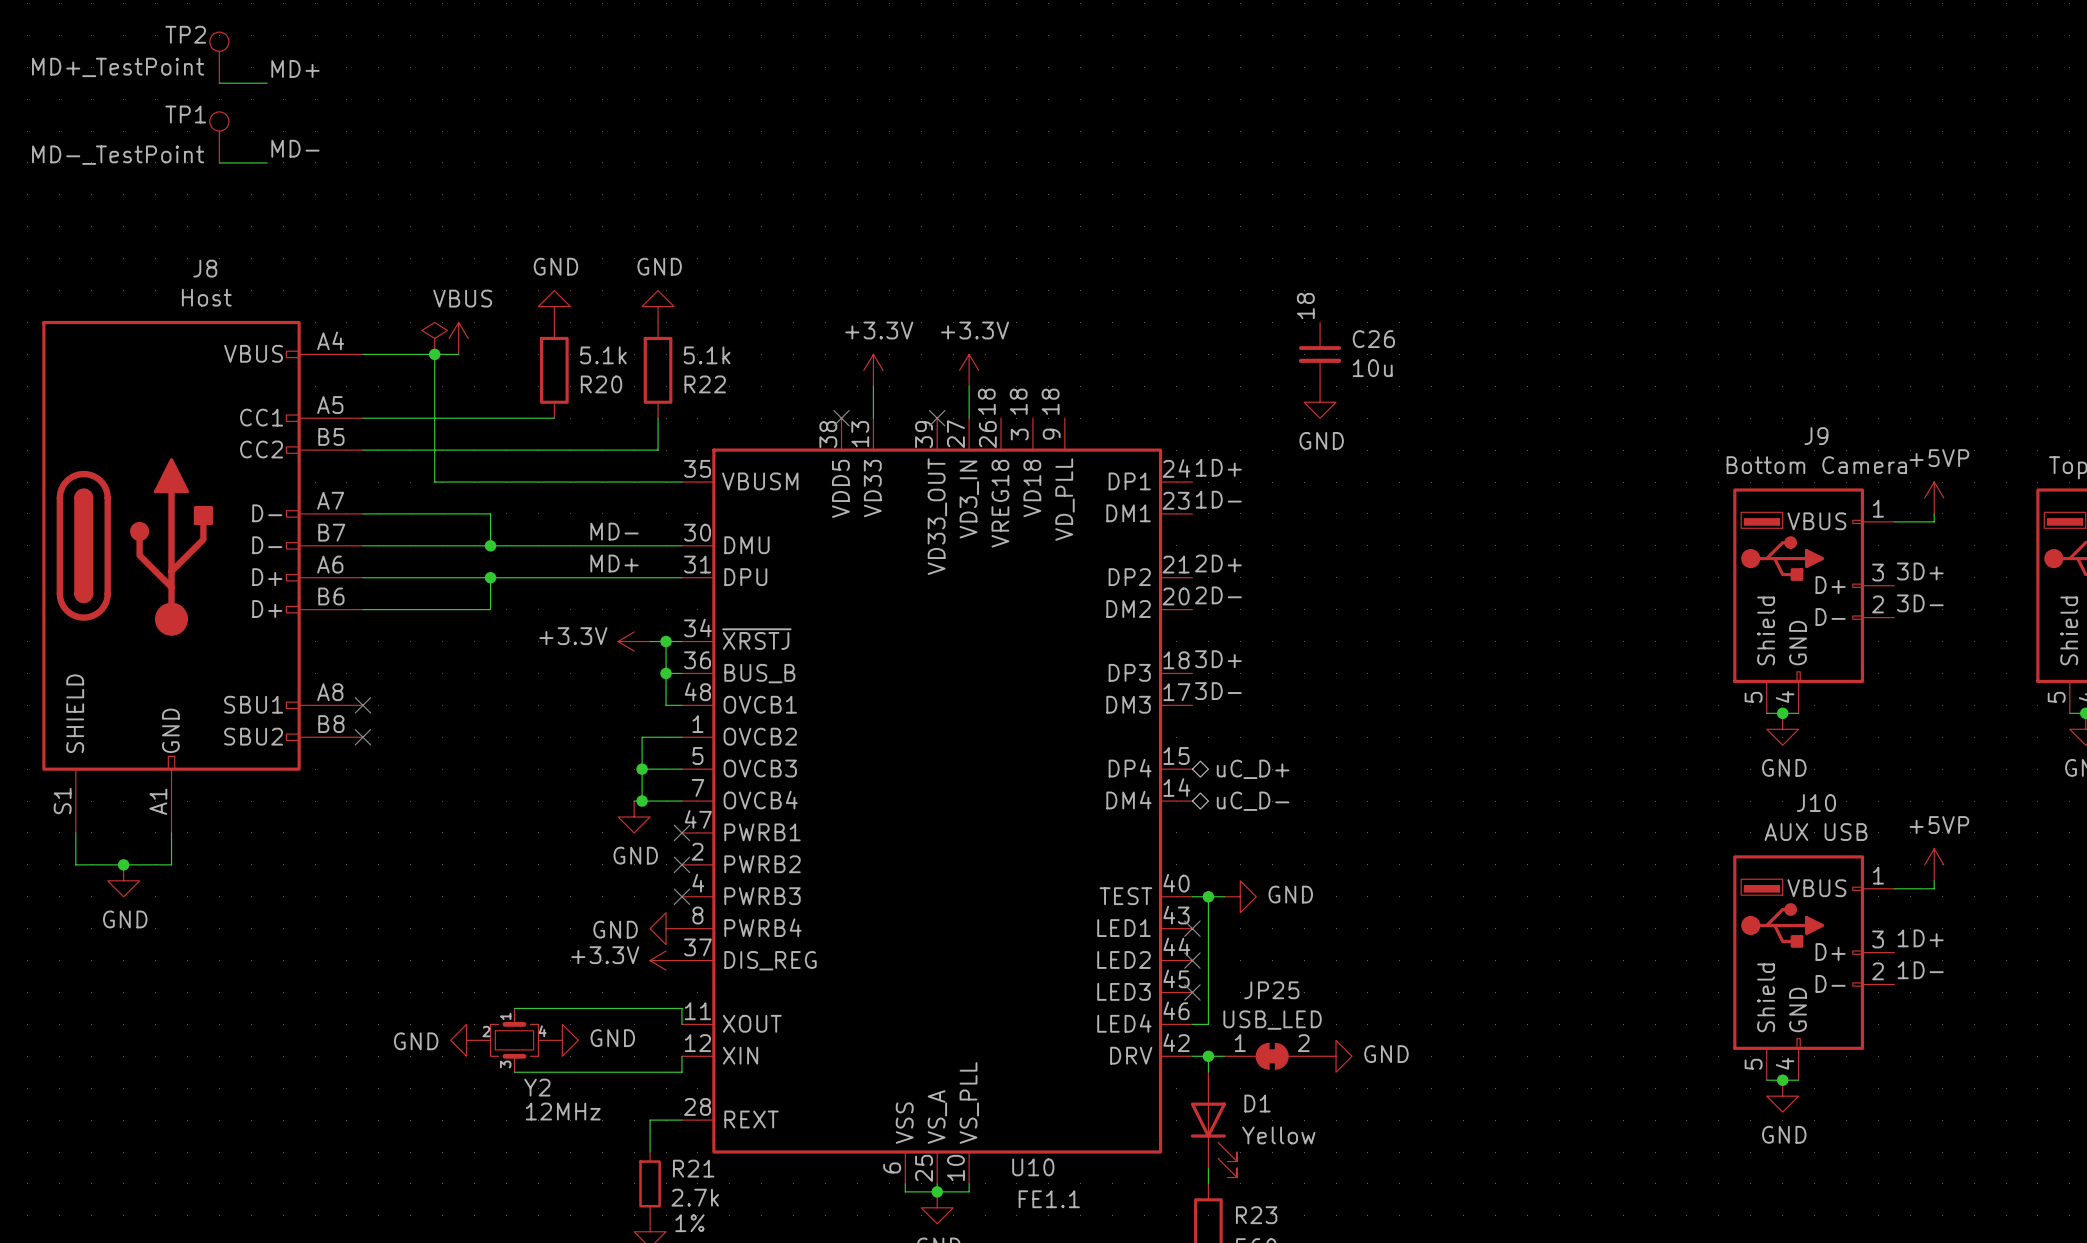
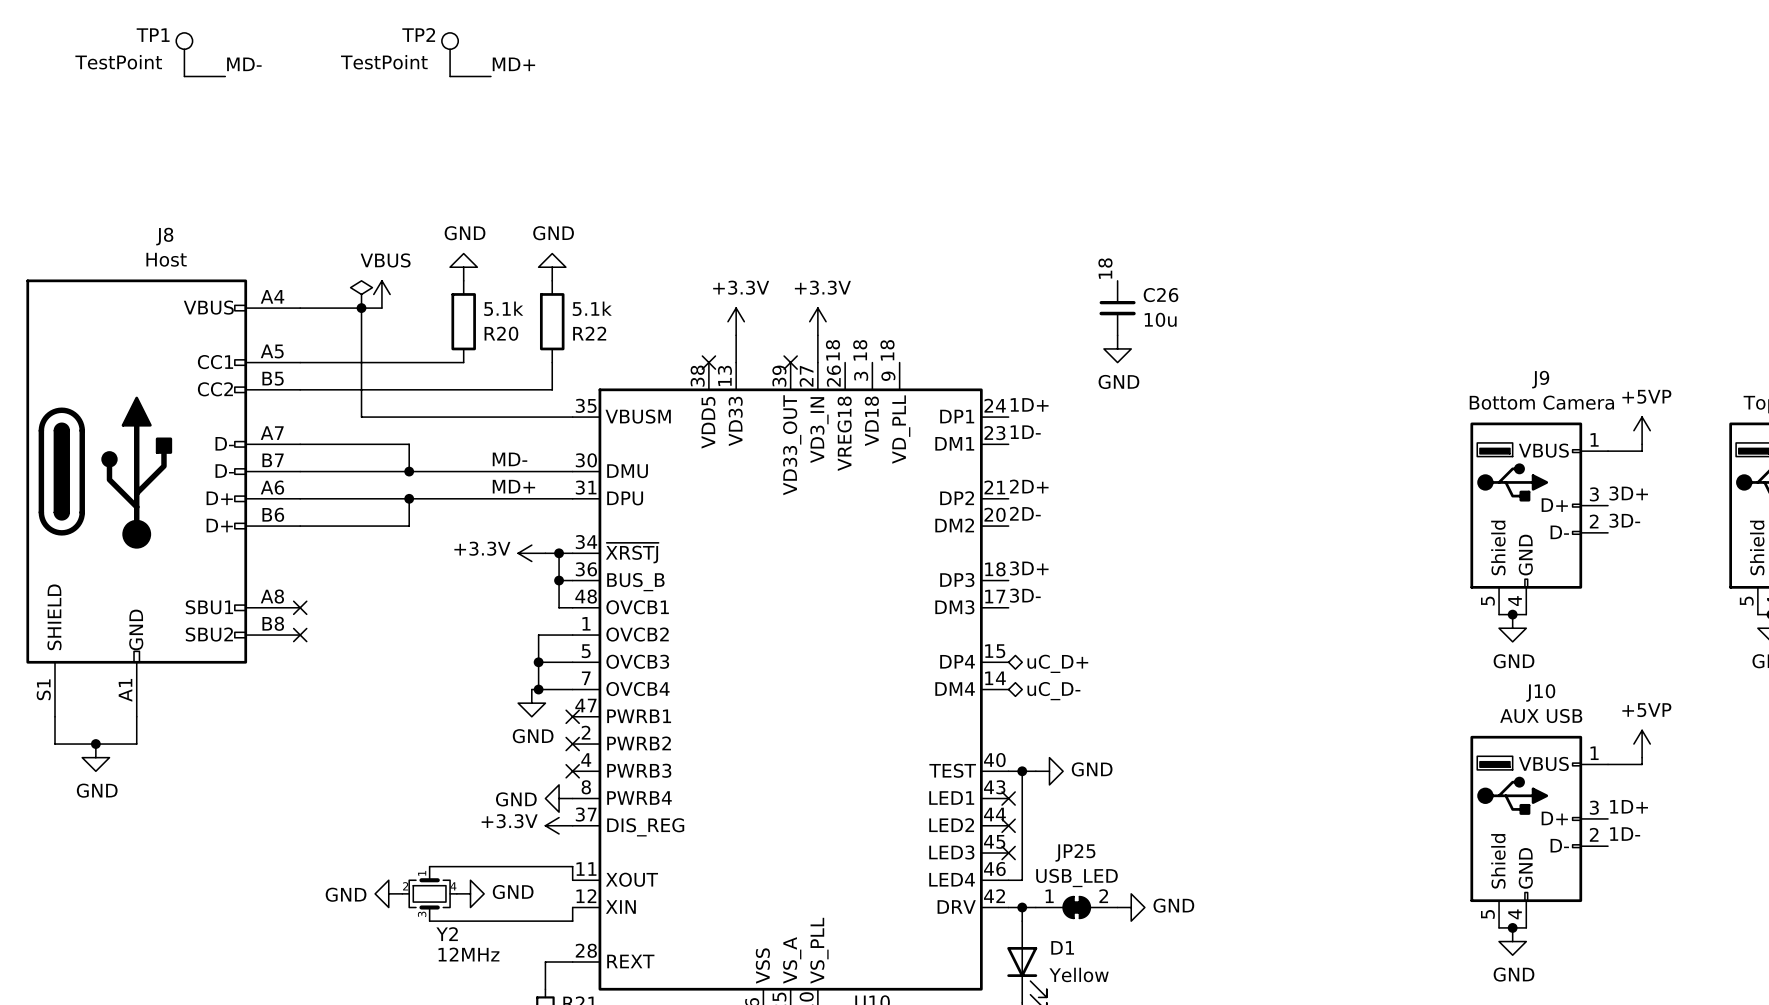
TP2 position: (219, 57) -> (450, 54)
TP2 value: MD+_TestPoint (118, 67) -> TestPoint (384, 62)
label: MD+ (295, 68) -> MD- (244, 64)
label: none -> MD+ (513, 64)
wire: (219, 83) (227, 83) -> (218, 76) (225, 76)
wire: none -> (450, 76) (490, 76)
TP1 position: (219, 137) -> (184, 54)
label: MD- (295, 148) -> none
TP1 value: MD-_TestPoint (118, 155) -> TestPoint (118, 62)
wire: (219, 162) (267, 162) -> none

